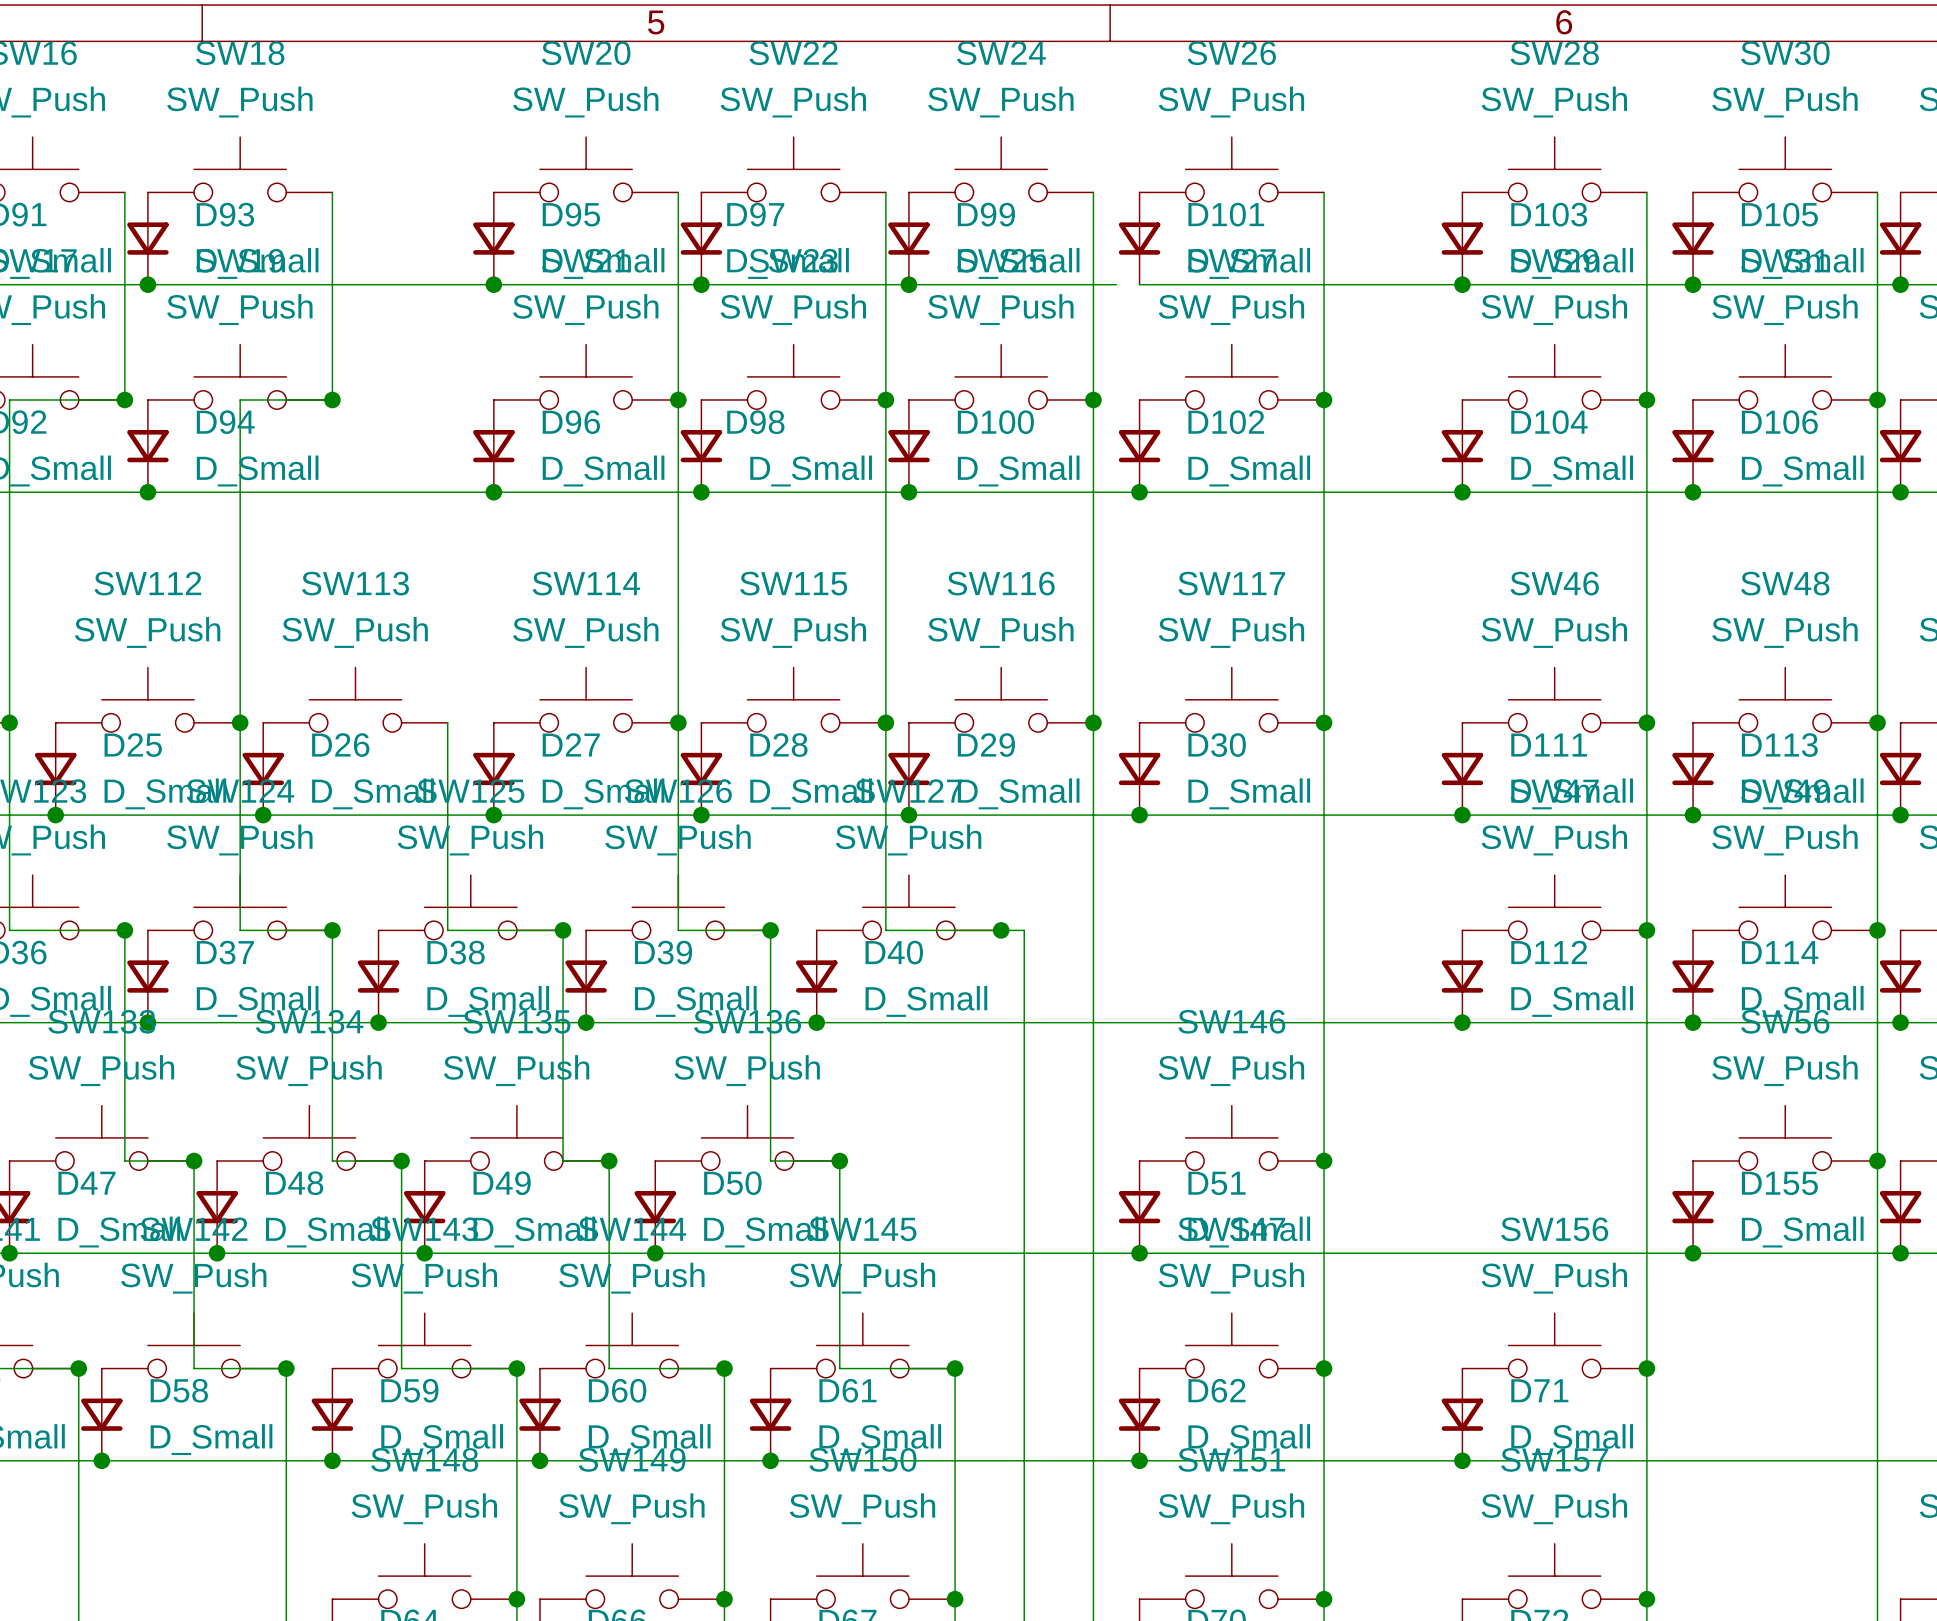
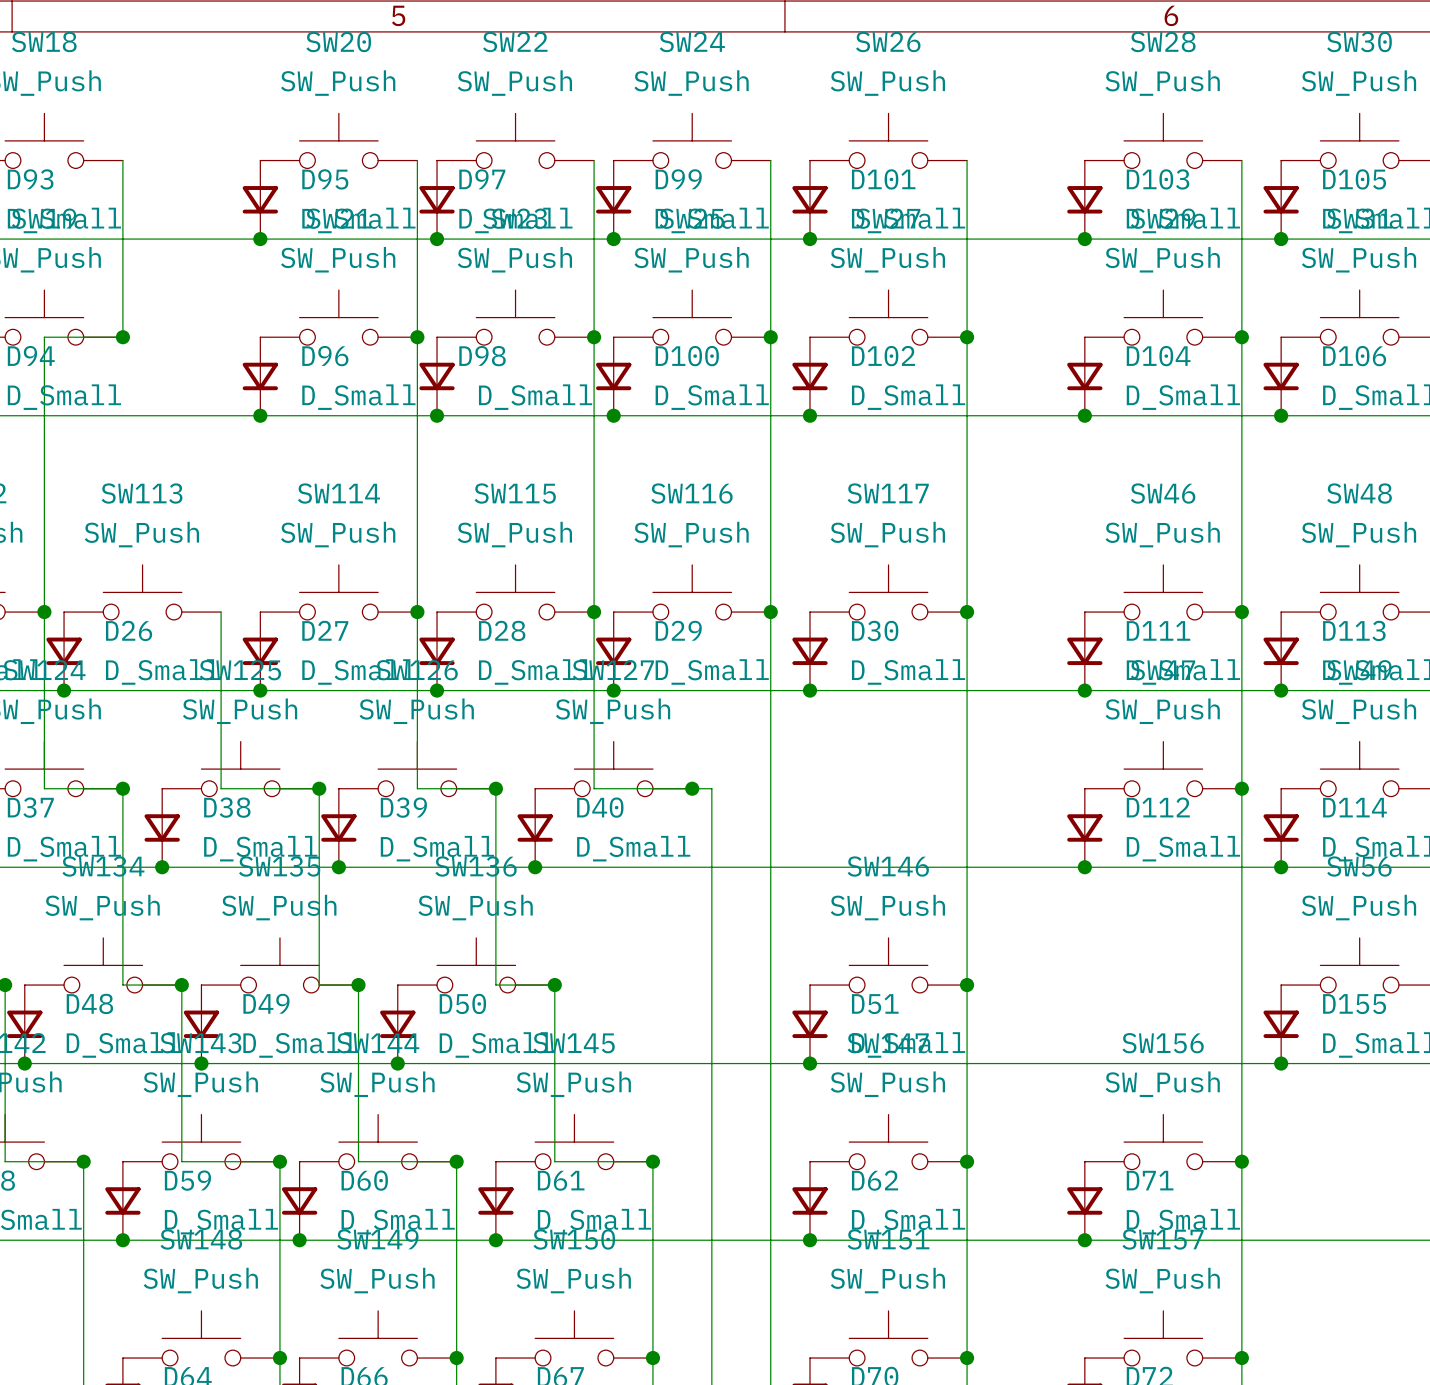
wire: none -> (790, 239) (810, 239)
junction: none -> (810, 239)

